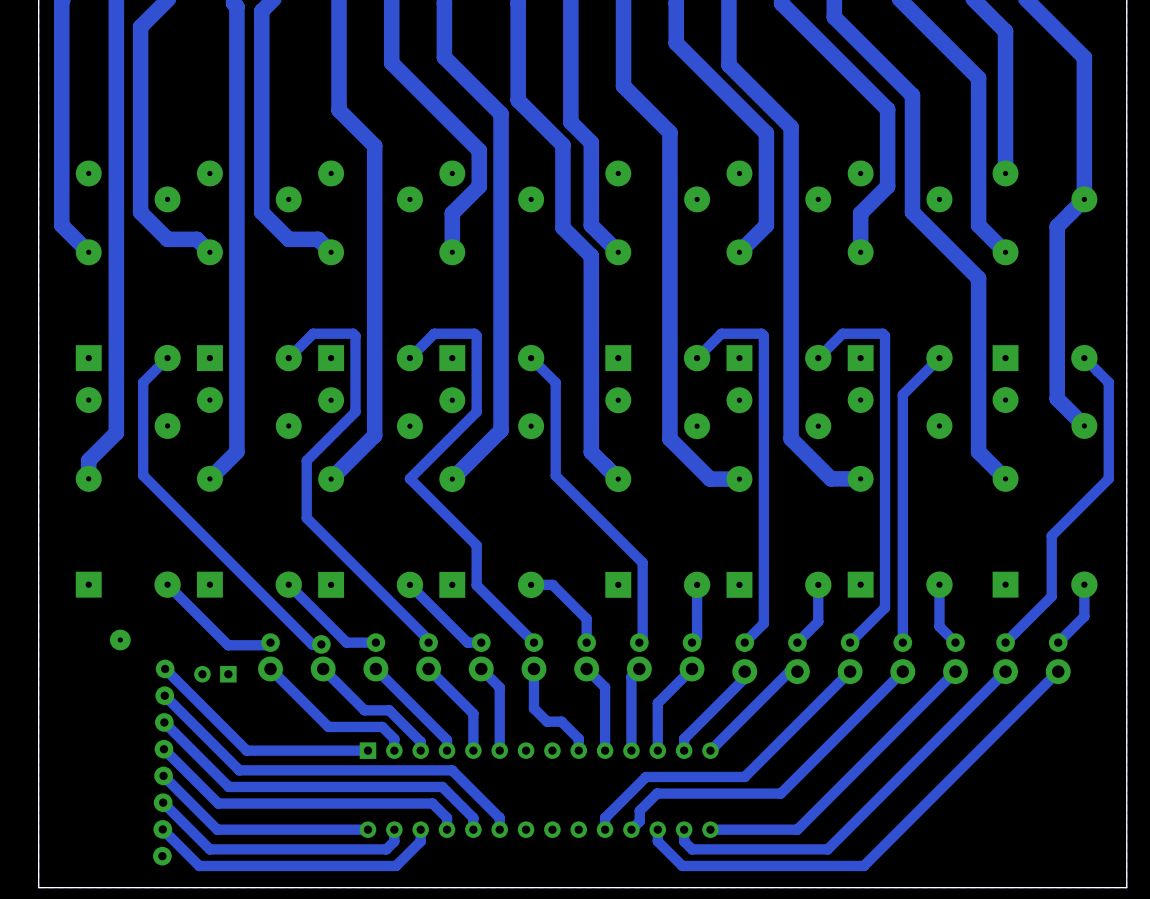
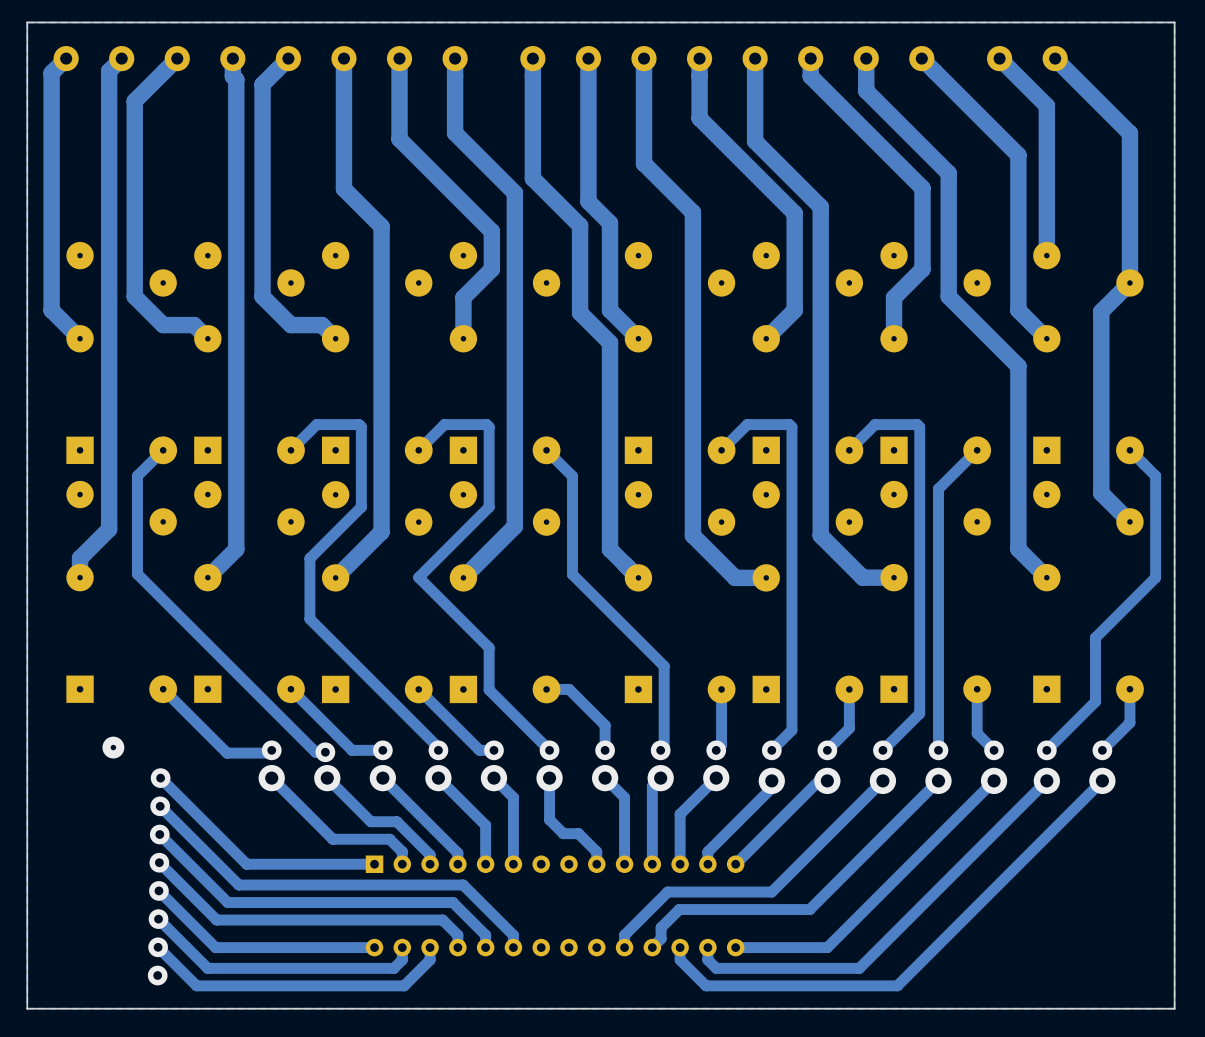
part: (215, 674) -> none

